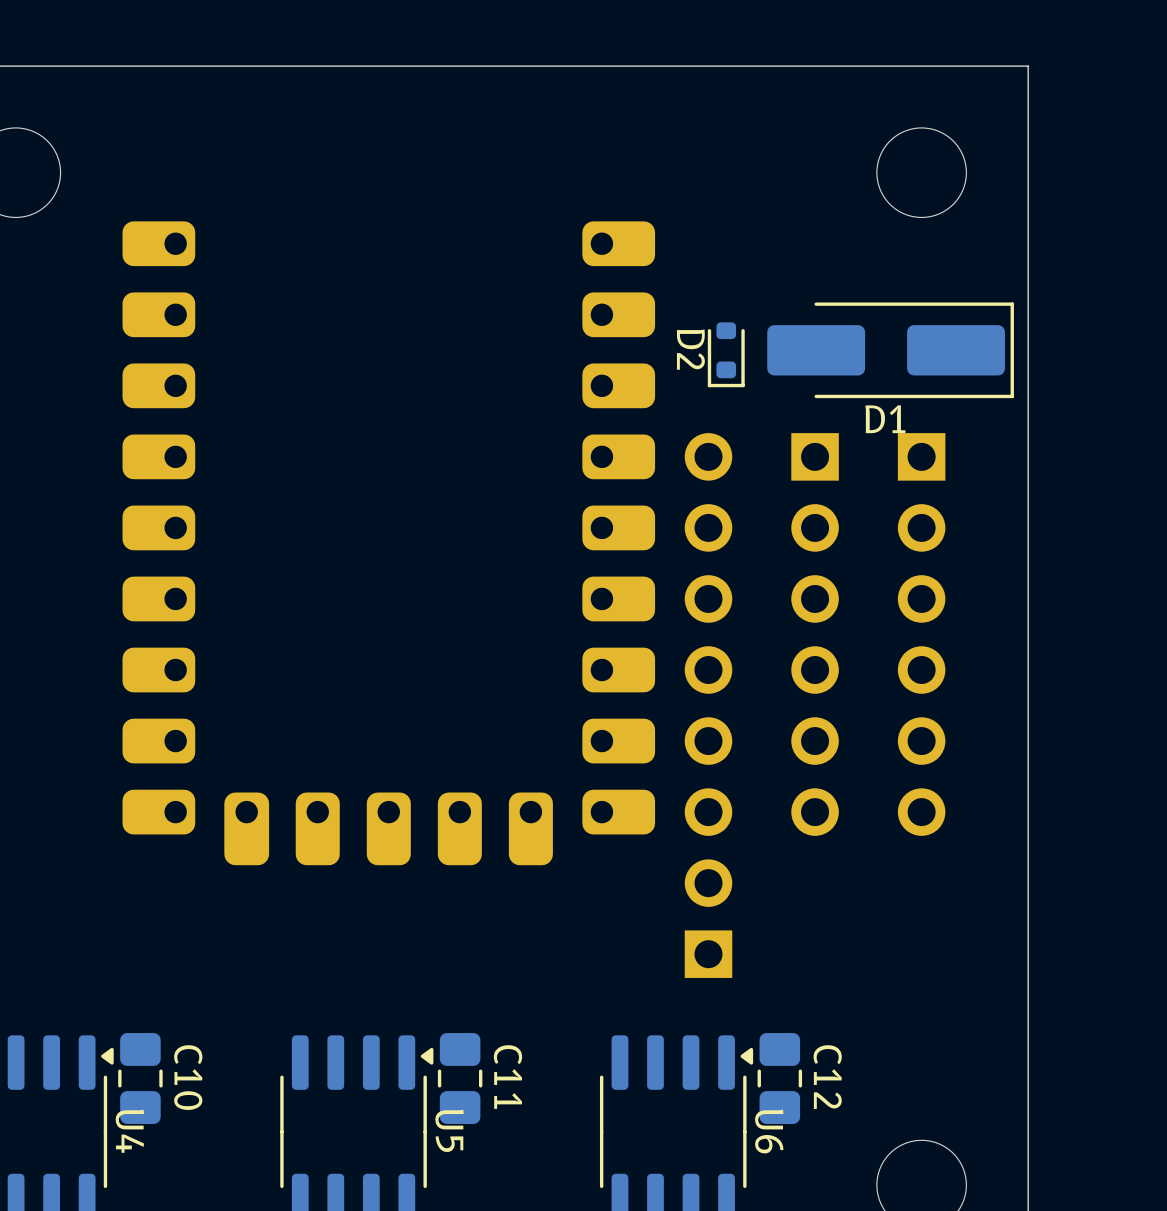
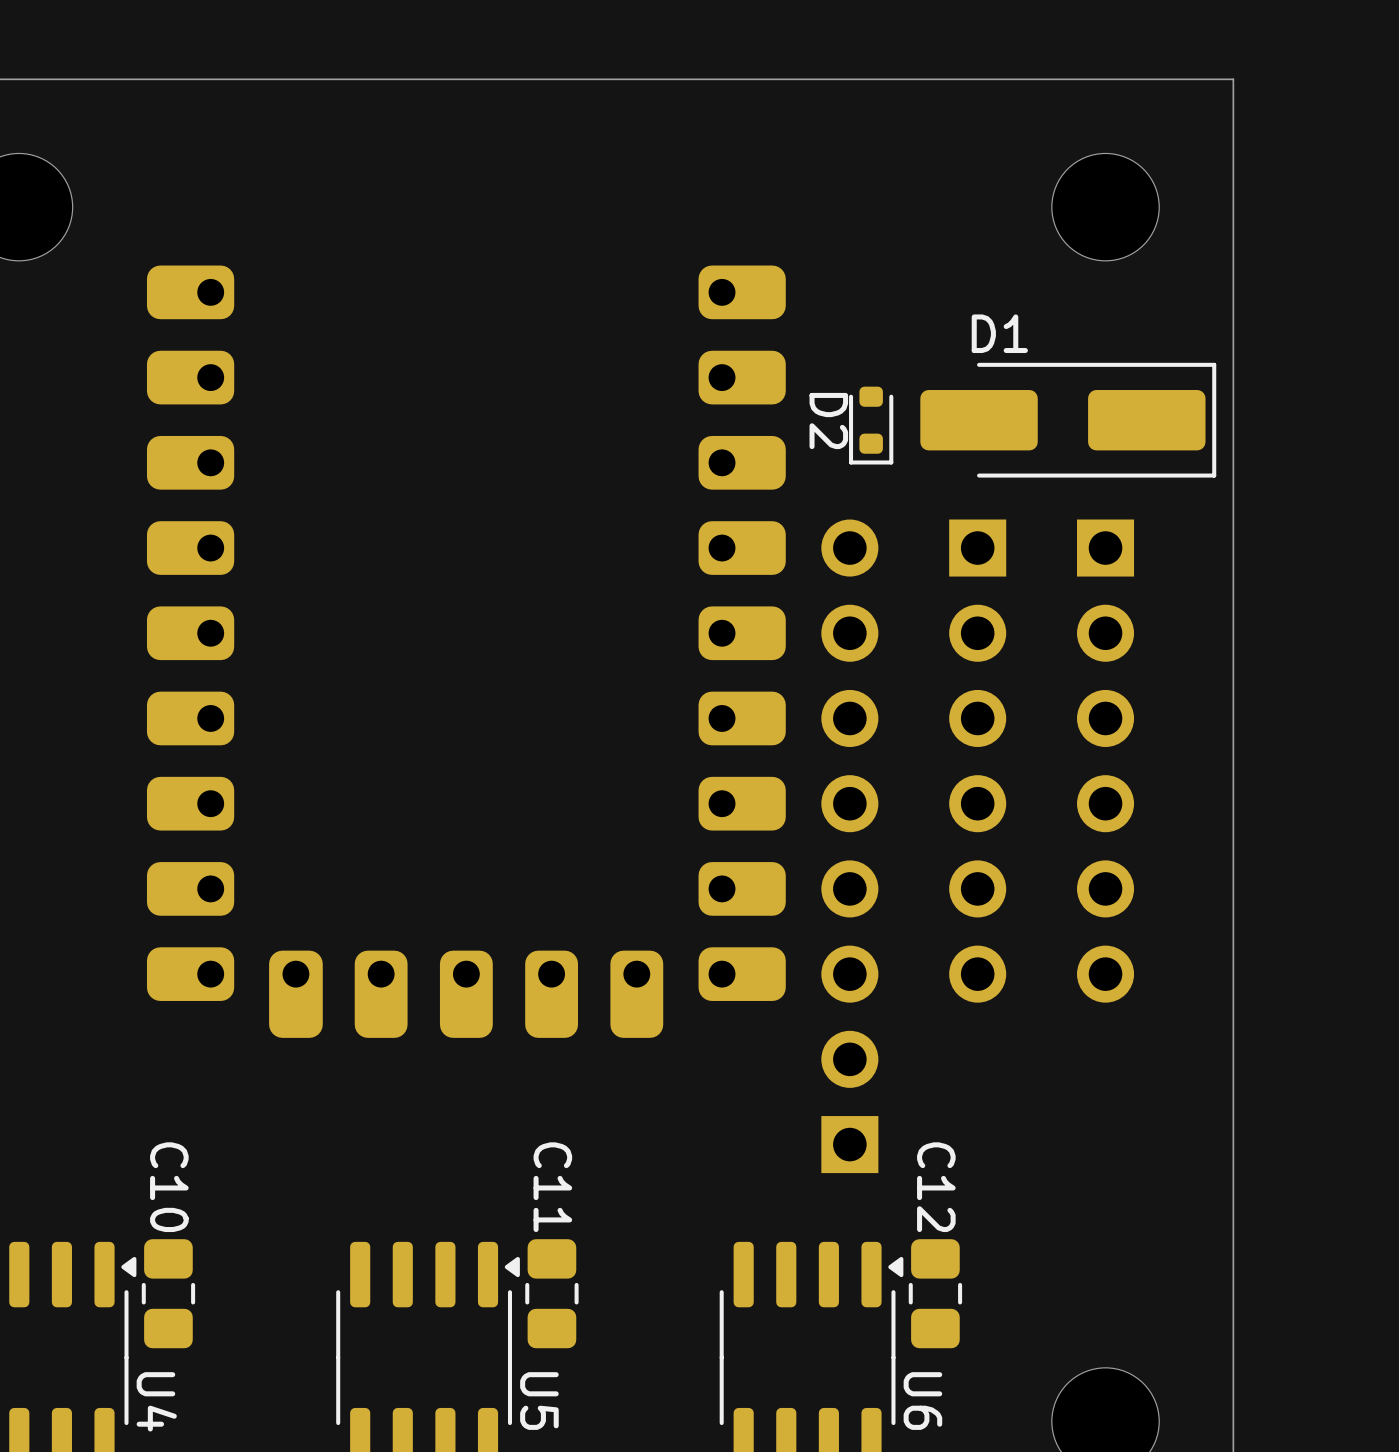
D1 name position: D1 (885, 419) -> D1 (999, 333)
C10 name position: C10 (188, 1077) -> C10 (169, 1187)
C11 name position: C11 (508, 1077) -> C11 (552, 1187)
C12 name position: C12 (827, 1077) -> C12 (936, 1187)
U5 name position: U5 (449, 1130) -> U5 (539, 1401)
U4 name position: U4 (129, 1131) -> U4 (156, 1401)
U6 name position: U6 (769, 1131) -> U6 (922, 1401)

